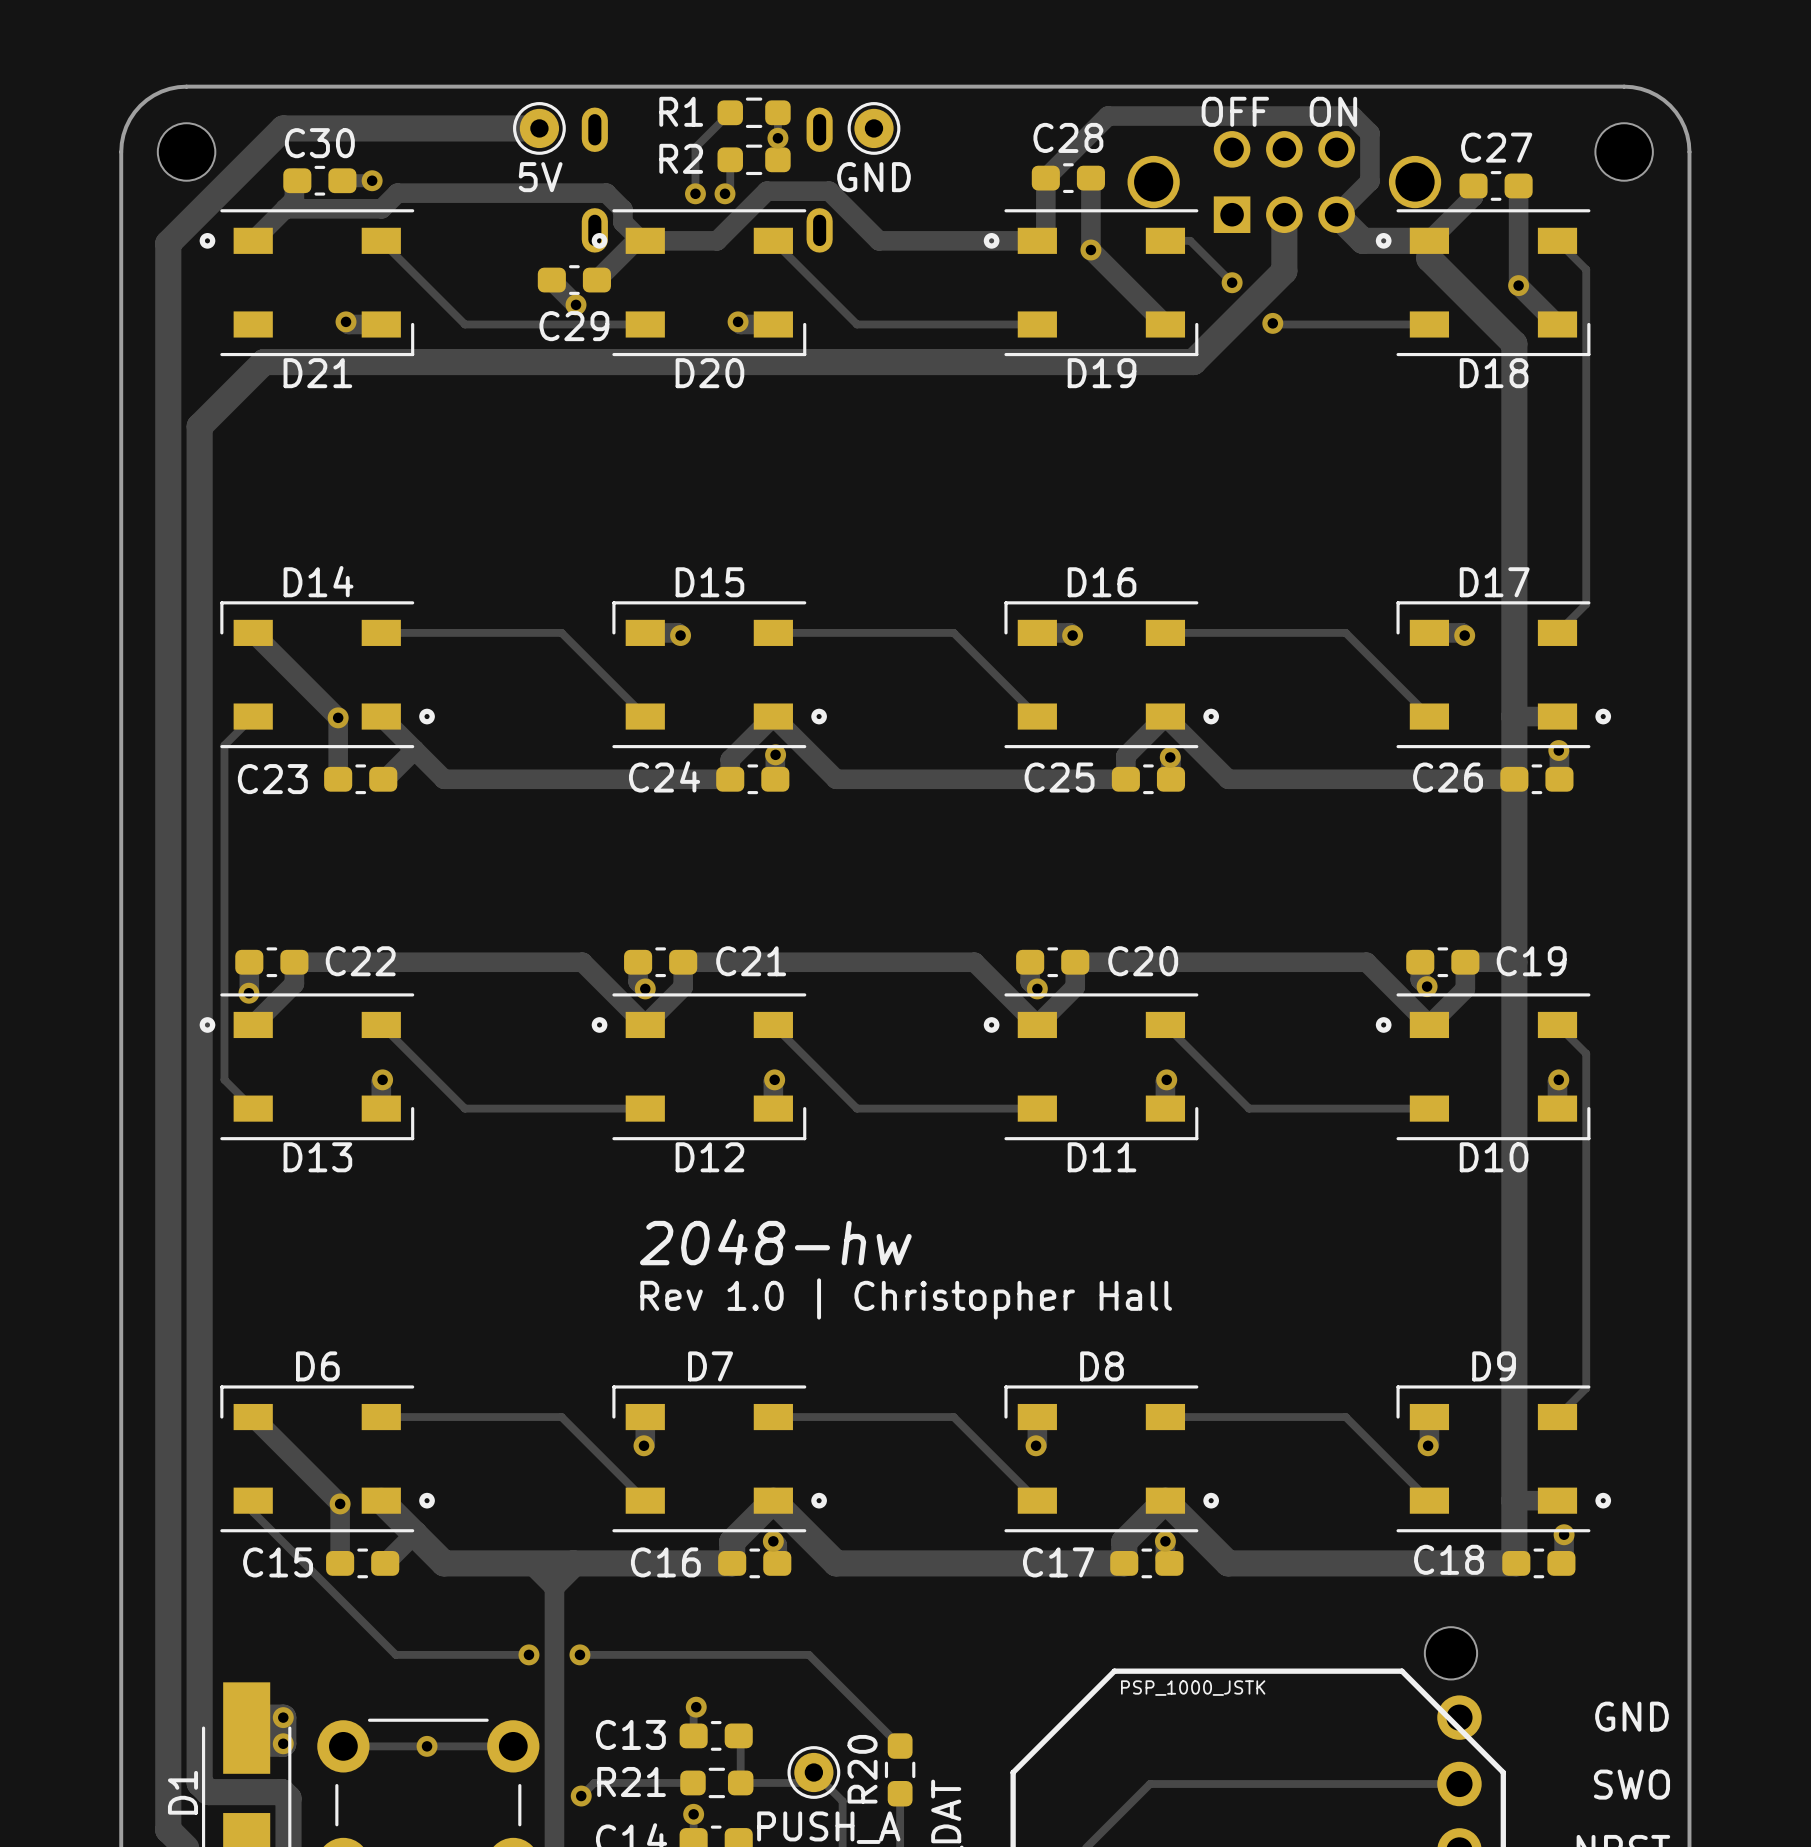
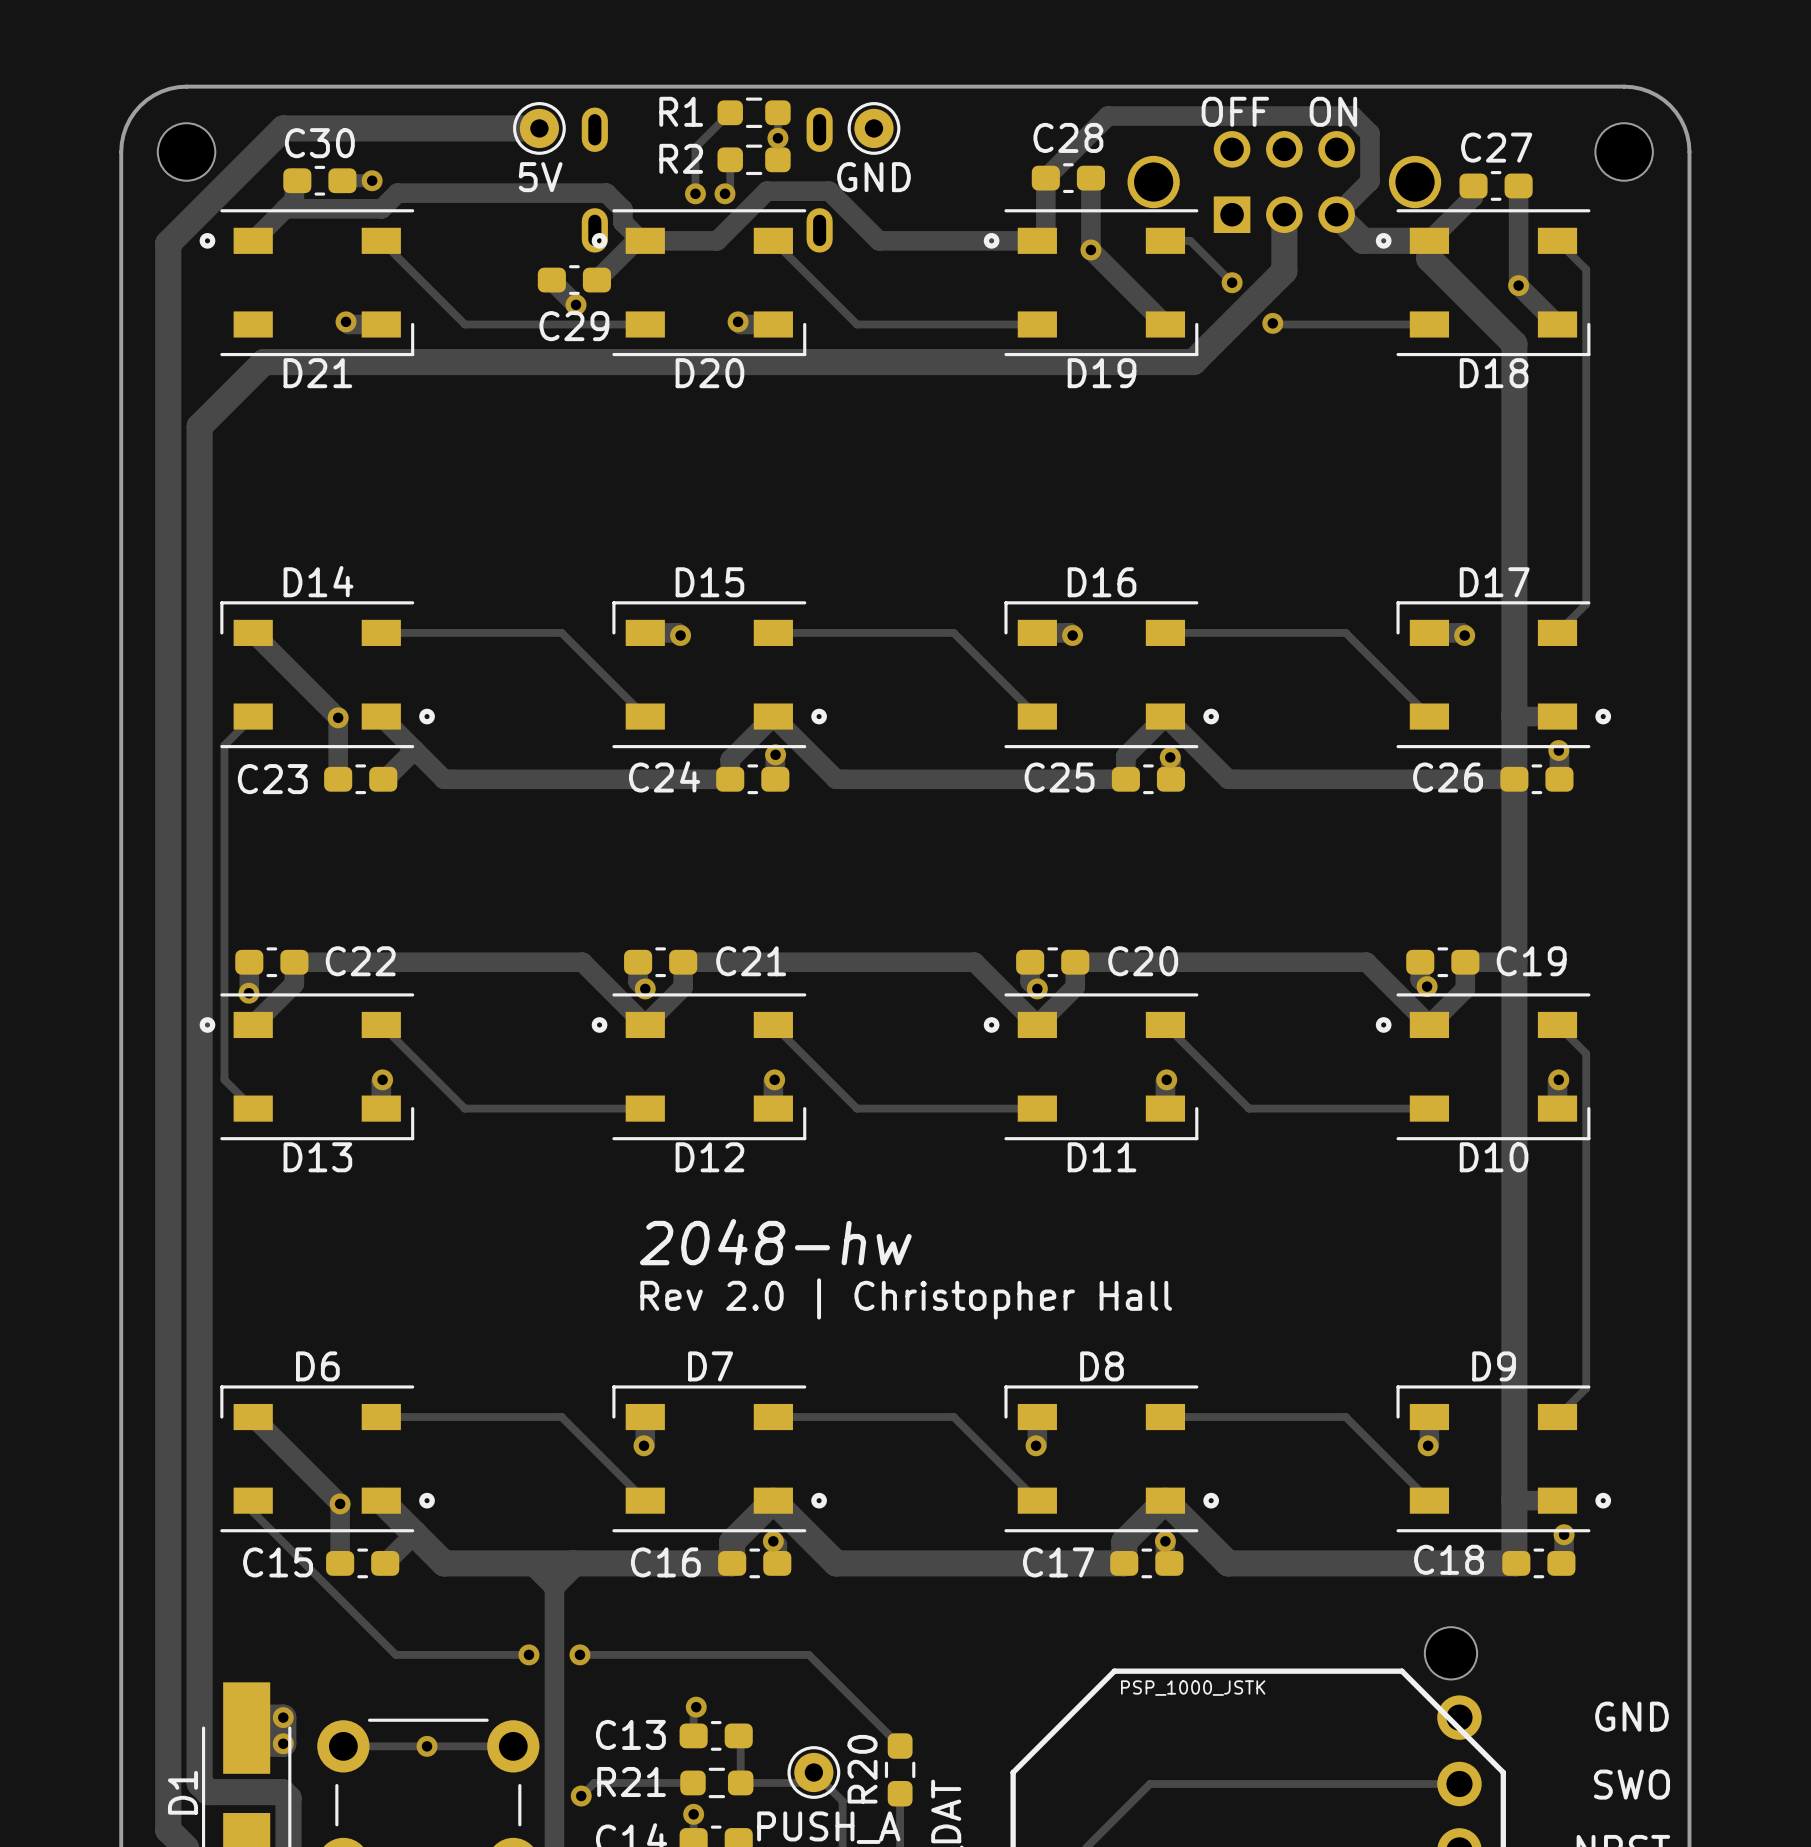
text: Rev 1.0 | Christopher Hall (906, 1298) -> Rev 2.0 | Christopher Hall (906, 1298)

